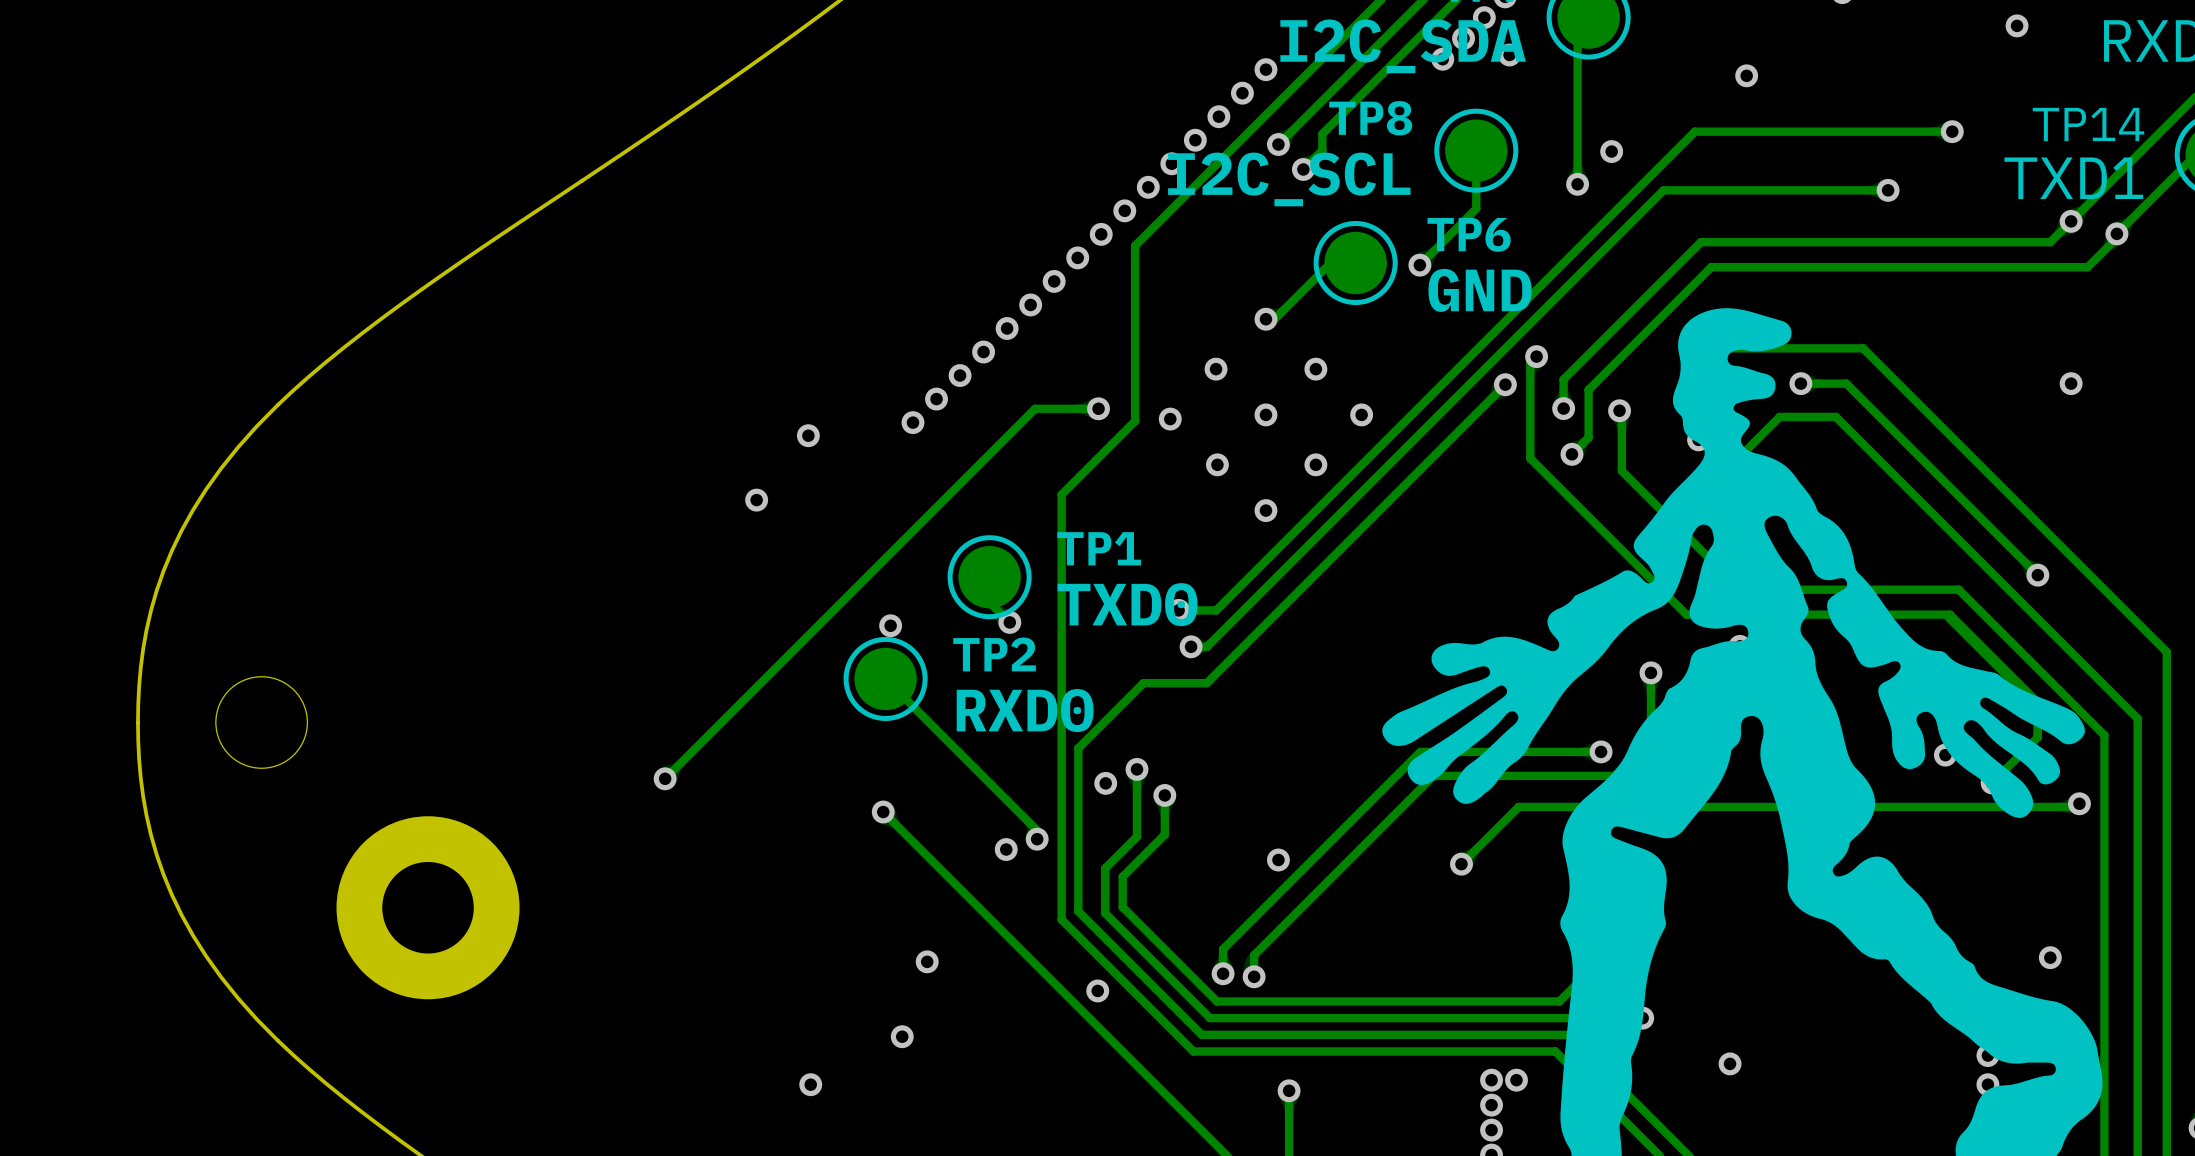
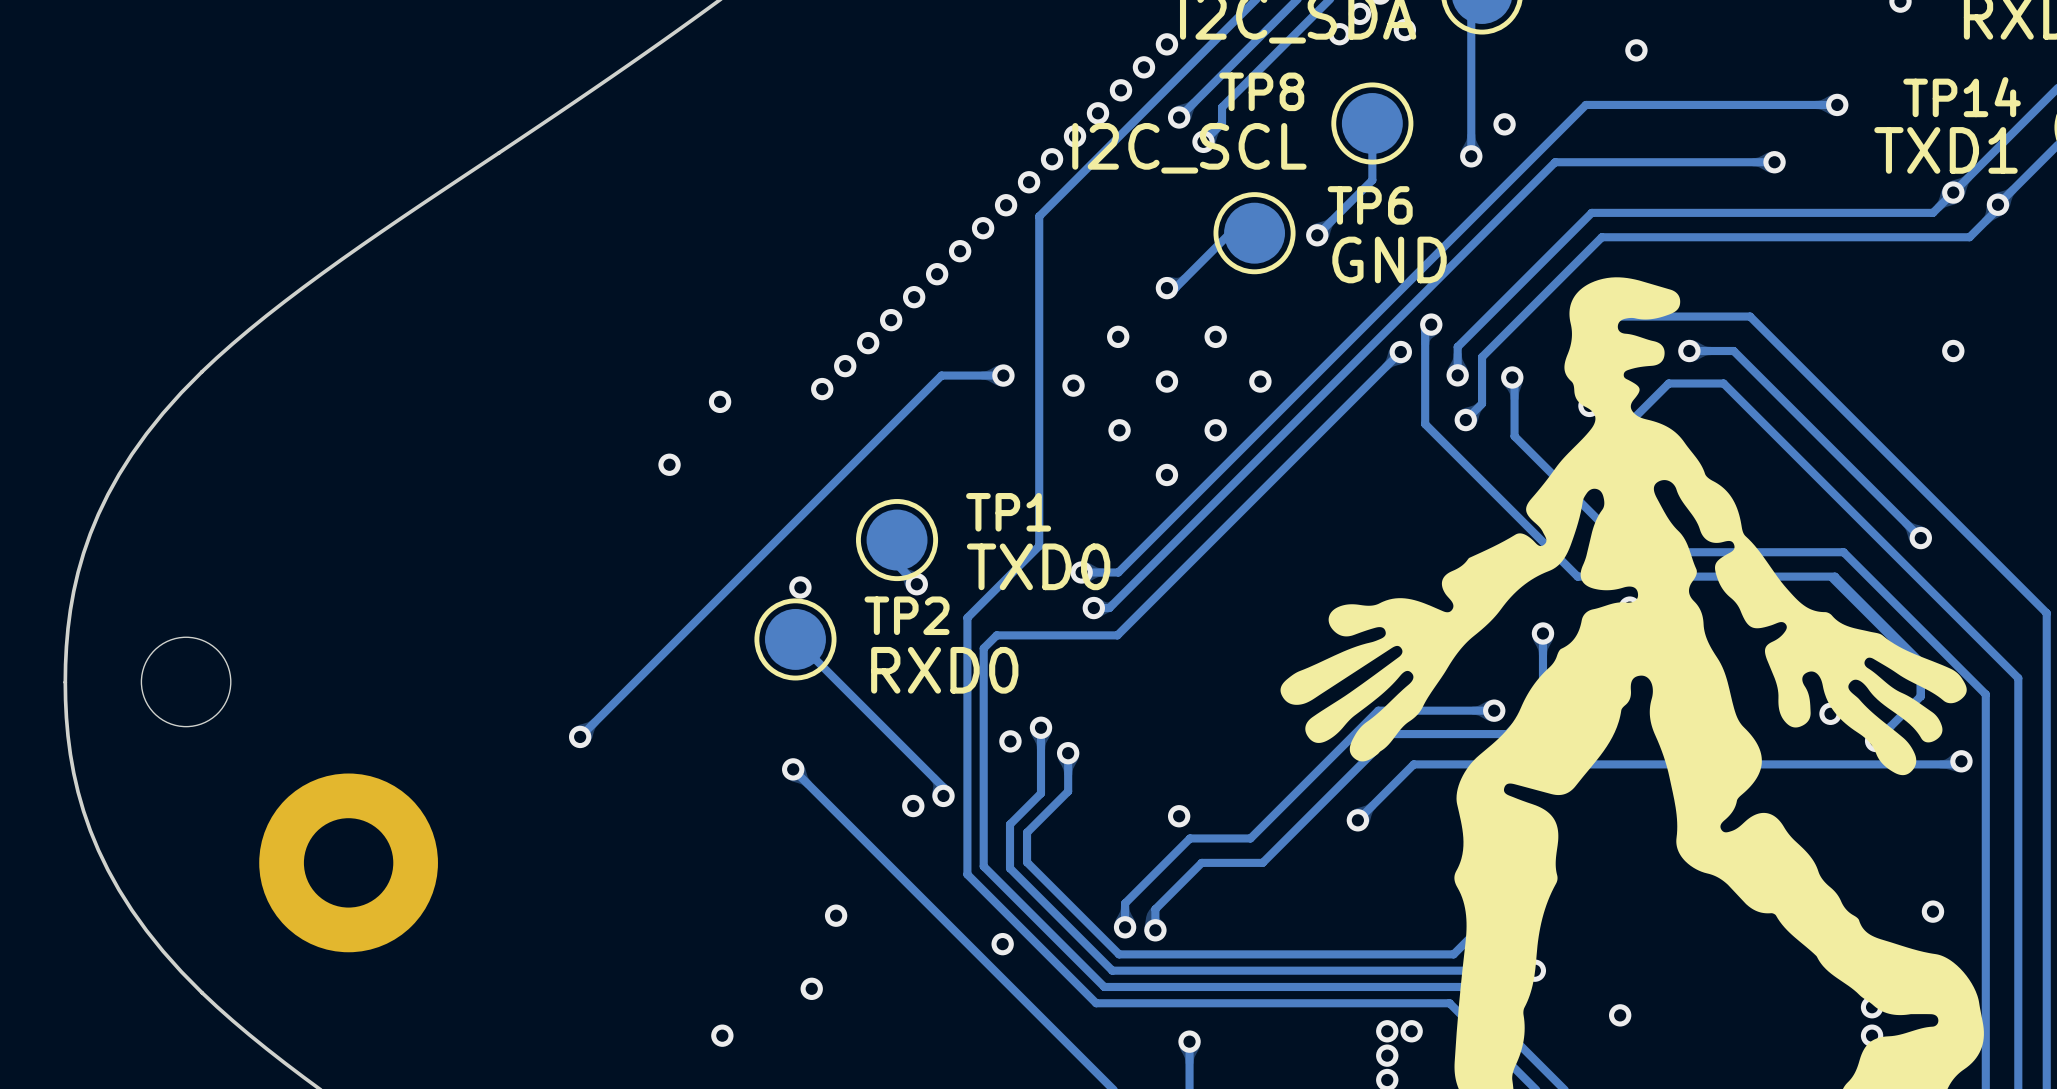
track: (1135, 421) (1061, 494) (1061, 656) -> (1039, 387) (1039, 546) (967, 617)
track: (1215, 674) (1206, 683) (1143, 683) (1078, 748) -> (1117, 635) (996, 635) (983, 648) (983, 707)
track: (1482, 751) (1420, 751) (1289, 882) -> (1378, 710) (1250, 838) (1190, 838)
track: (1495, 775) (1433, 775) (1301, 907) -> (1391, 734) (1262, 862) (1201, 862)

